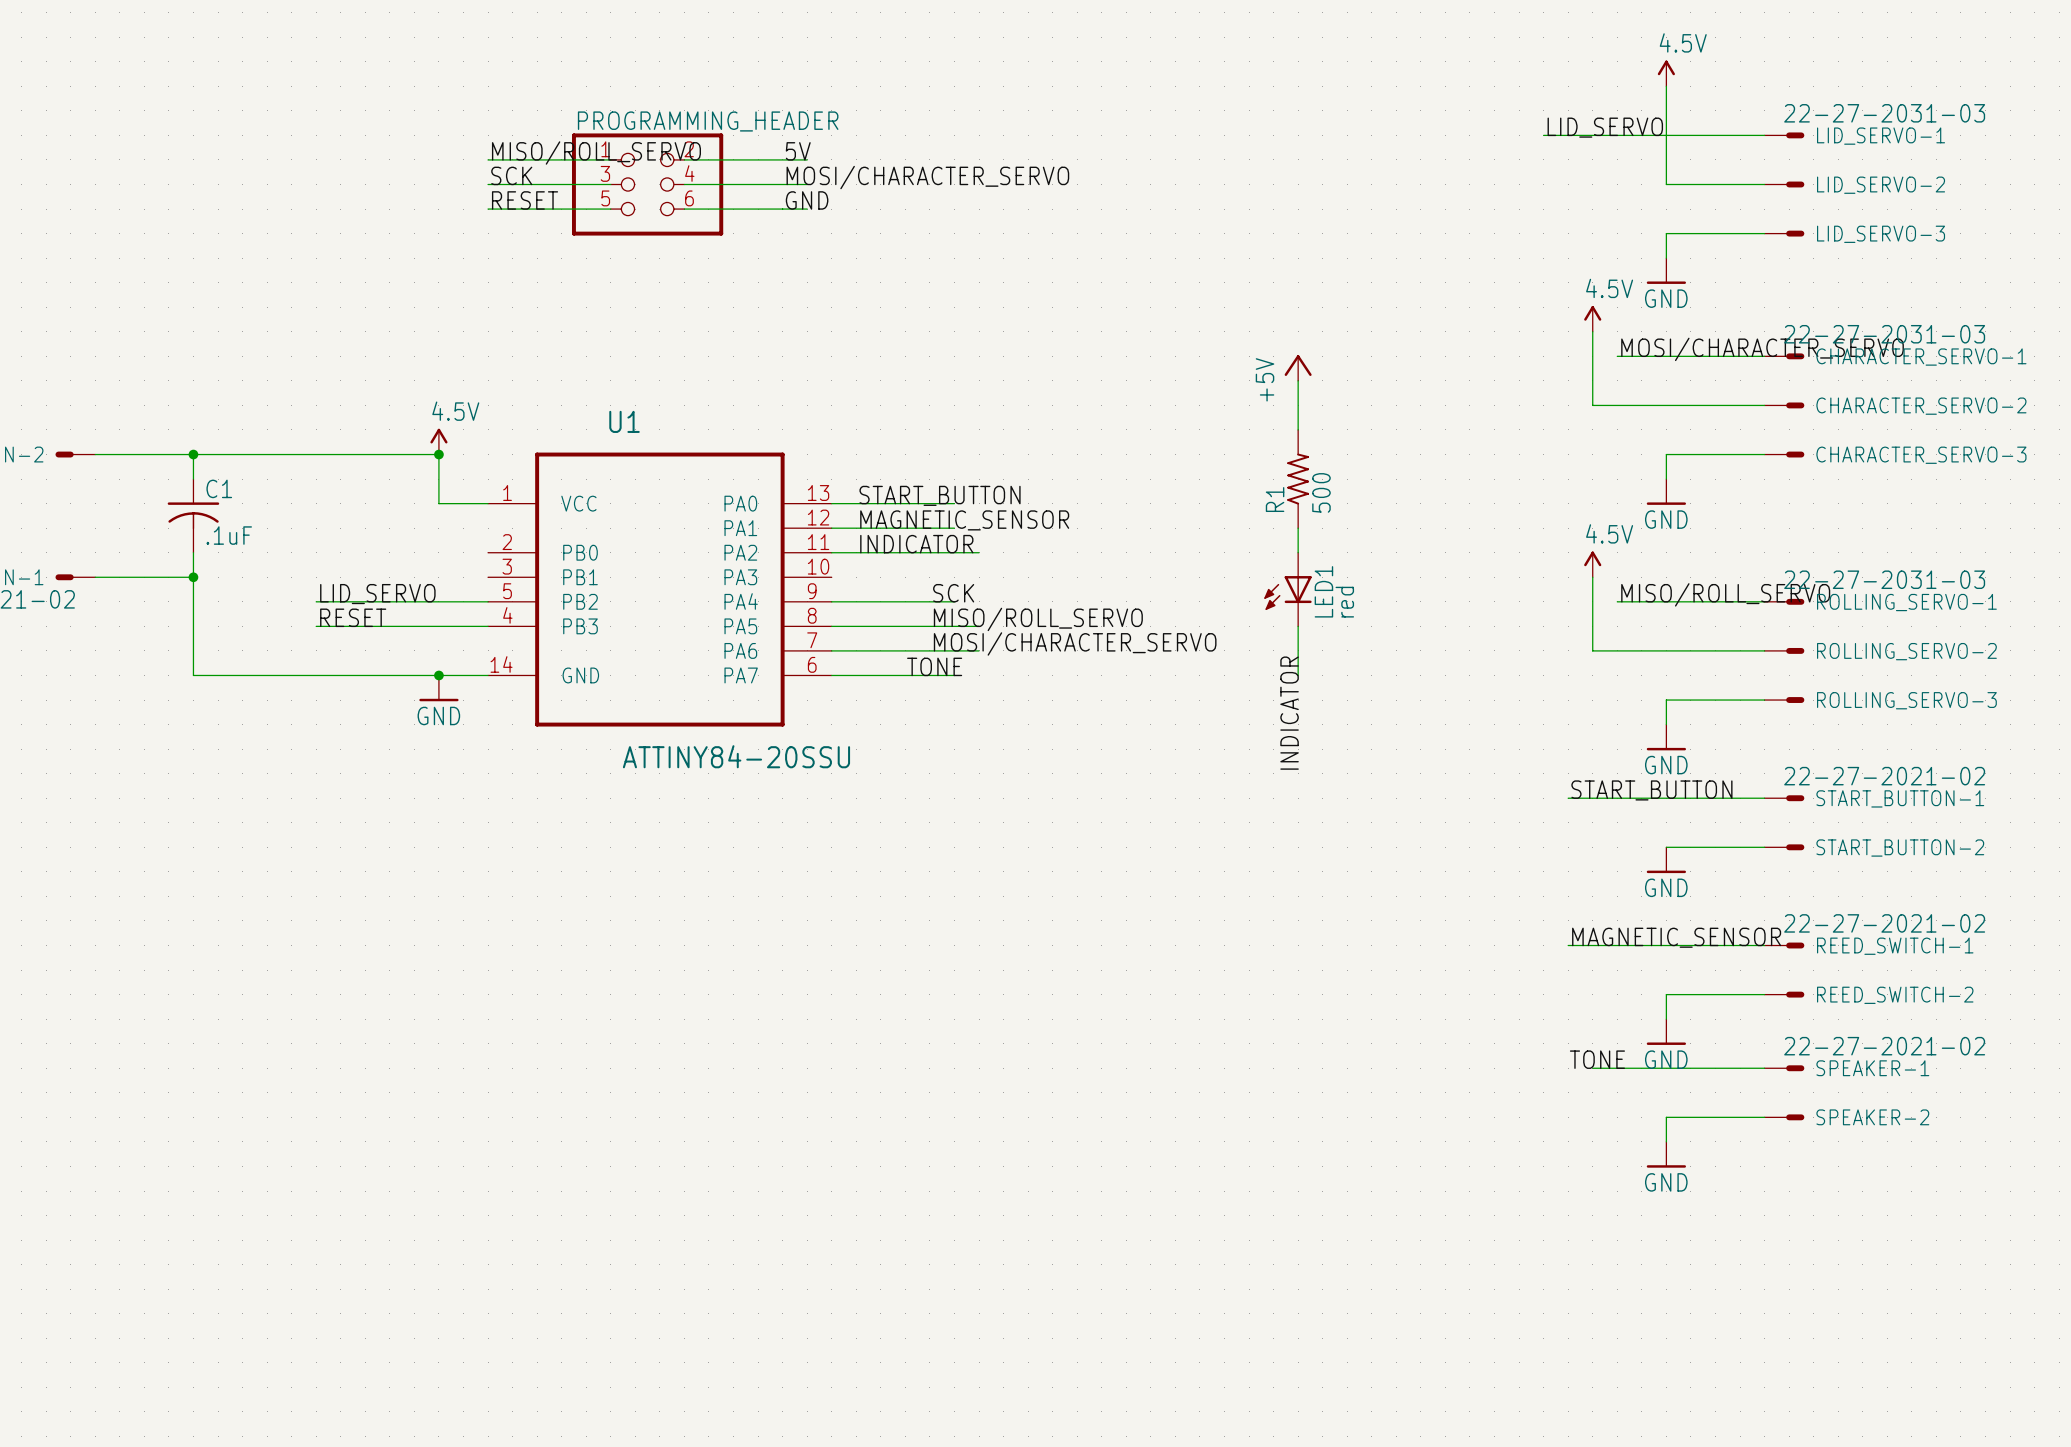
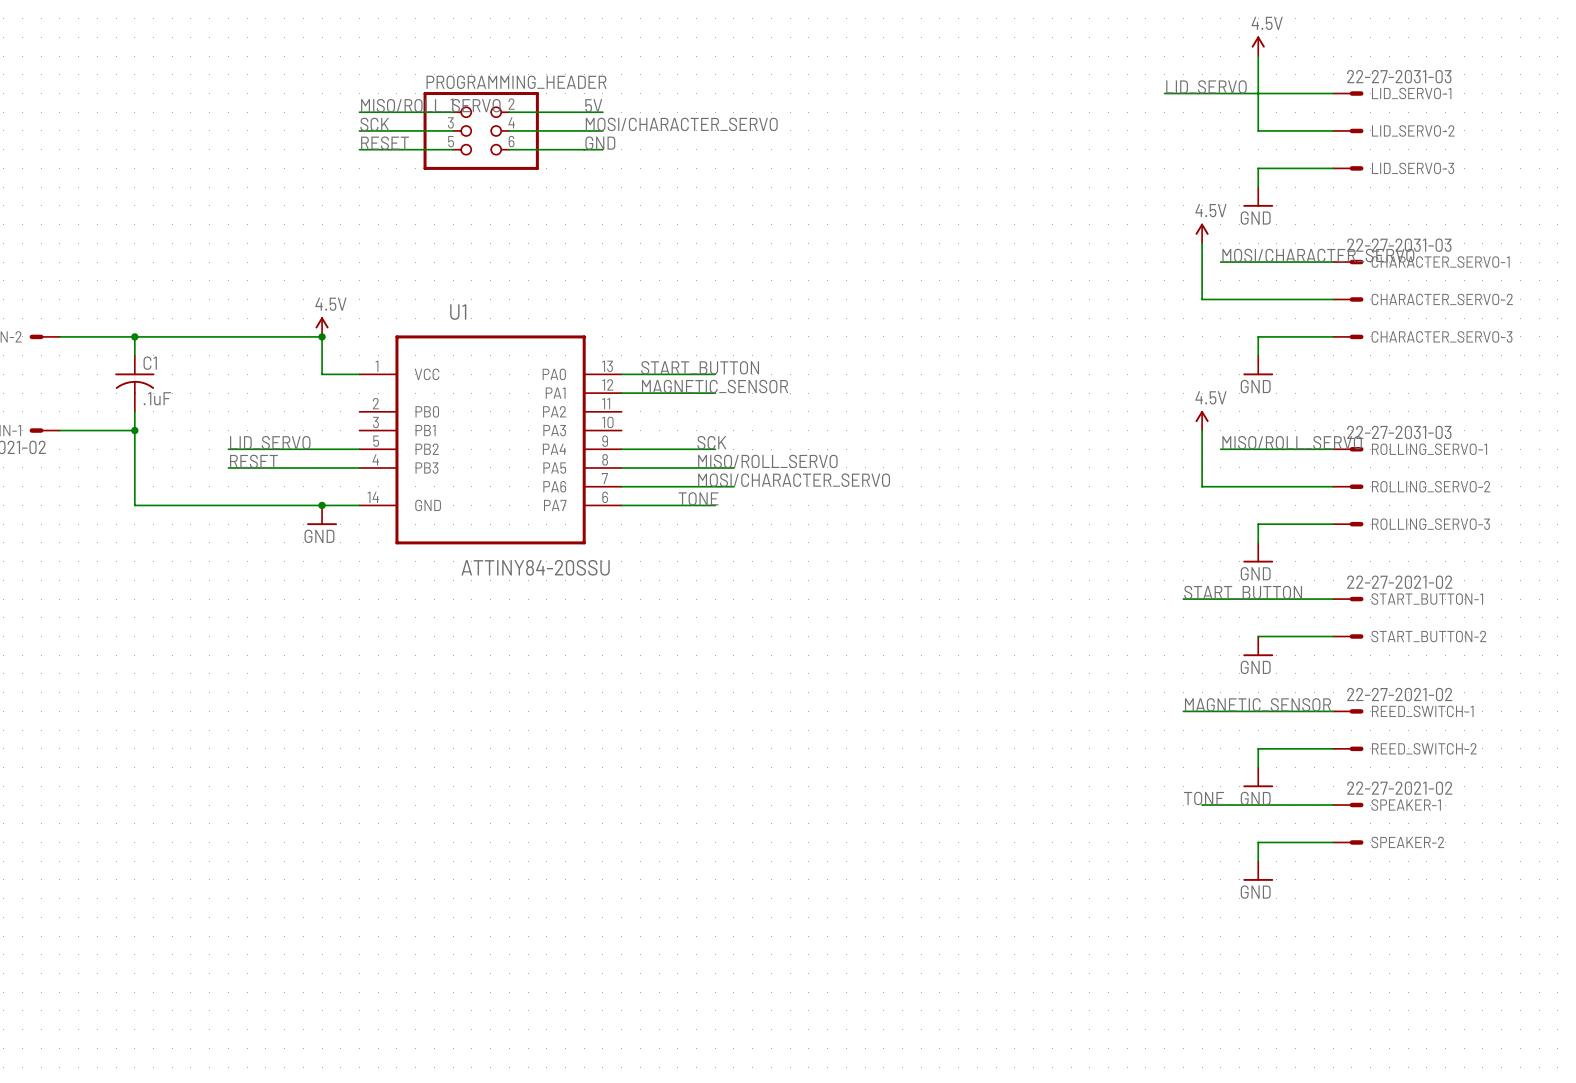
power symbol: +5V (1298, 368) -> none
wire: (1298, 380) (1298, 429) -> none
R1: 500 (1298, 479) -> none
wire: (1298, 528) (1298, 552) -> none
label: INDICATOR (916, 544) -> none
wire: (831, 552) (979, 552) -> none
LED1: red (1287, 589) -> none
wire: (1298, 626) (1298, 675) -> none
label: INDICATOR (1289, 713) -> none

